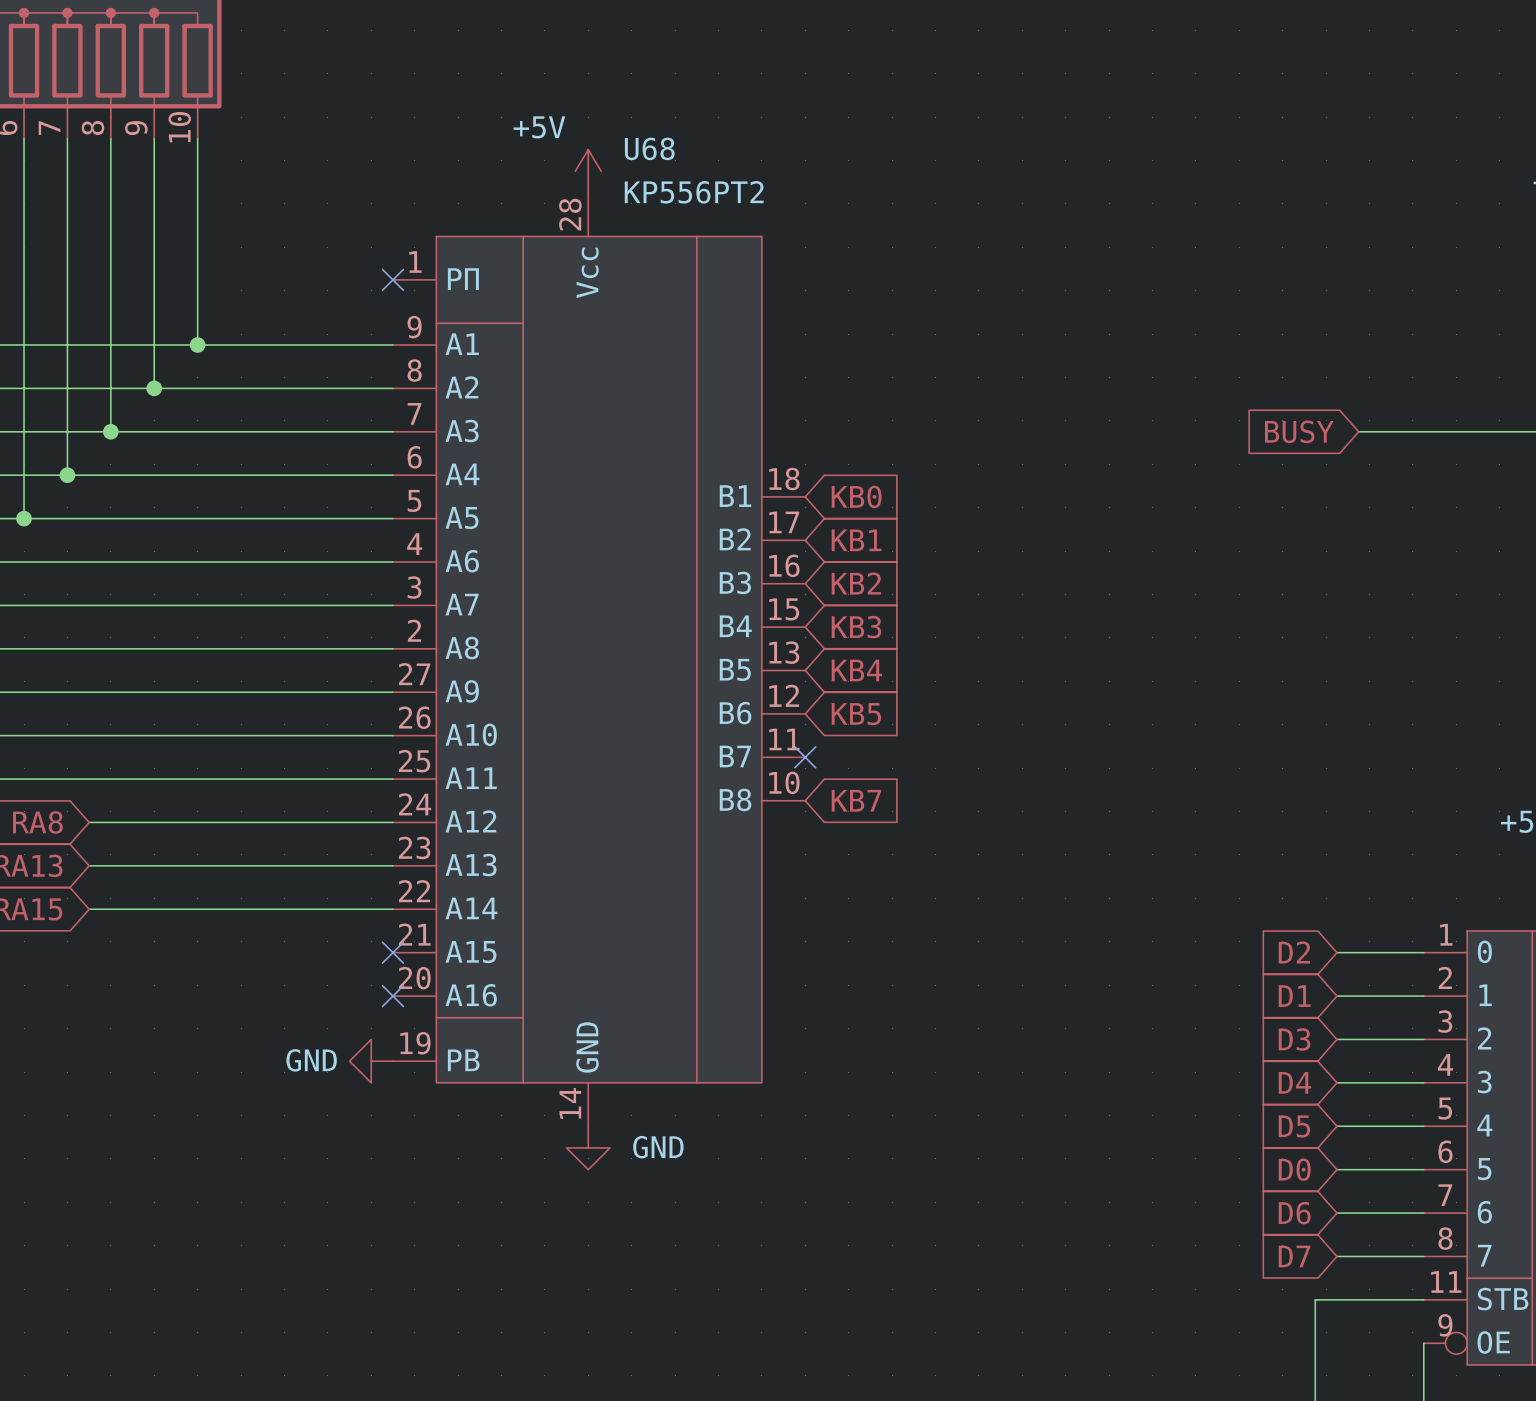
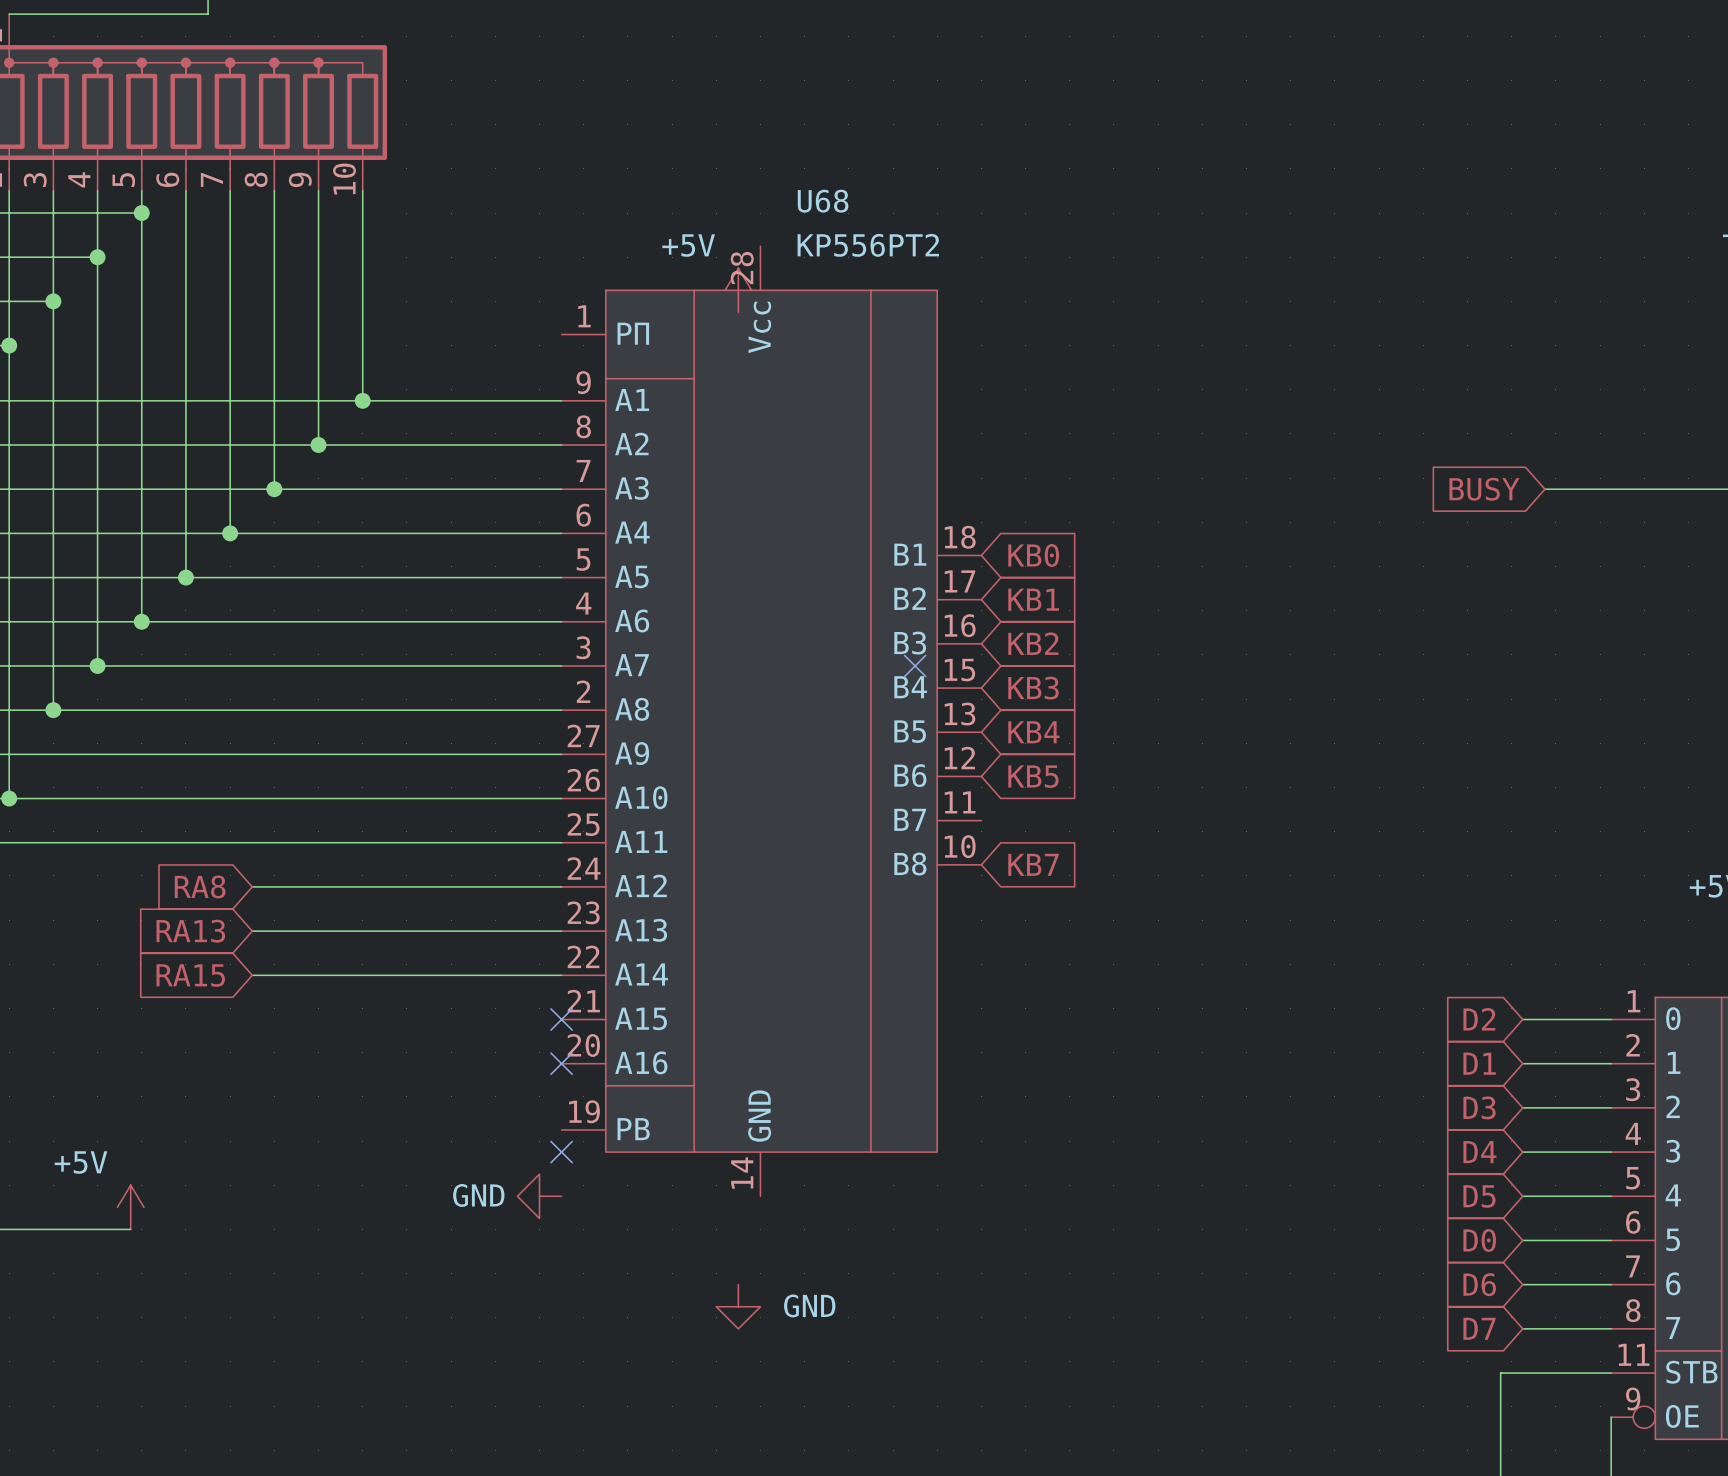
power symbol position: +5V (588, 171) -> +5V (738, 290)
no-connect mark: (392, 279) -> none
no-connect mark: none -> (915, 665)
no-connect mark: (805, 757) -> none
power symbol position: GND (371, 1061) -> GND (539, 1196)
no-connect mark: none -> (561, 1152)
power symbol position: GND (588, 1147) -> GND (738, 1306)

